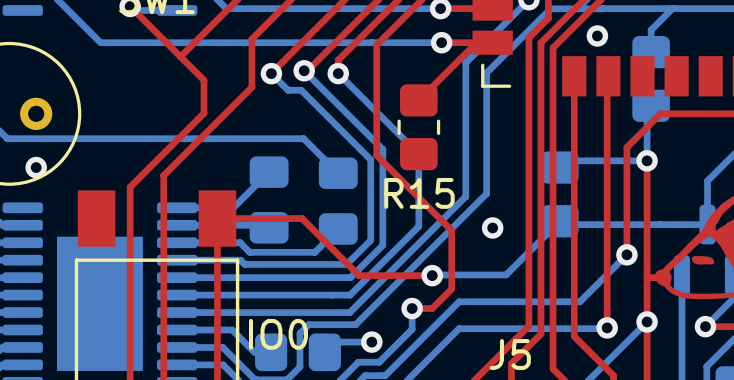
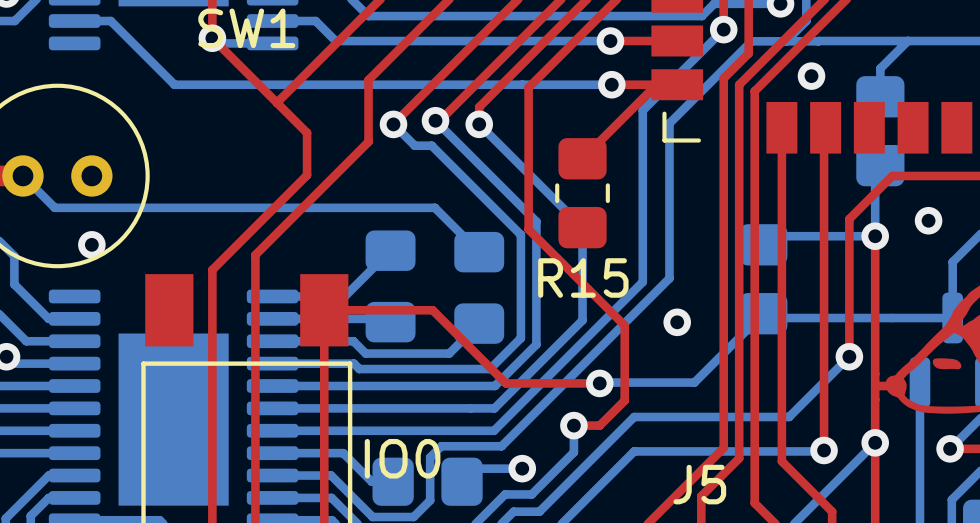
via: none -> (928, 220)

